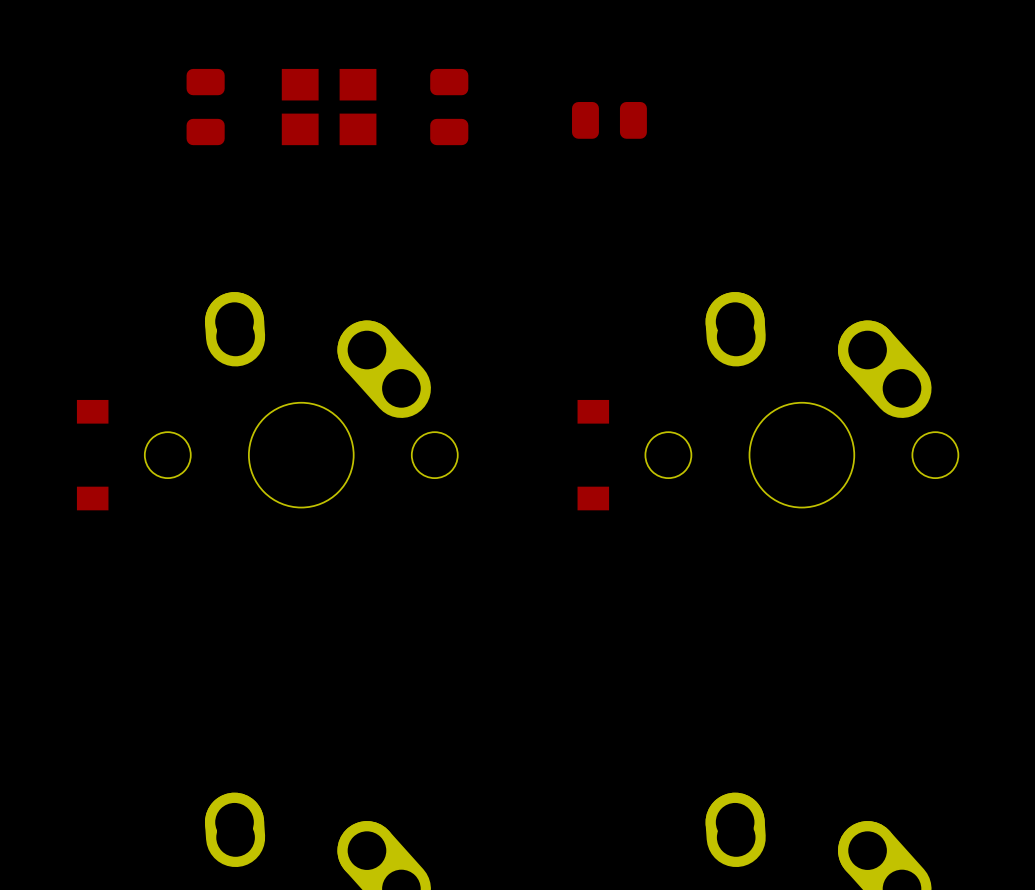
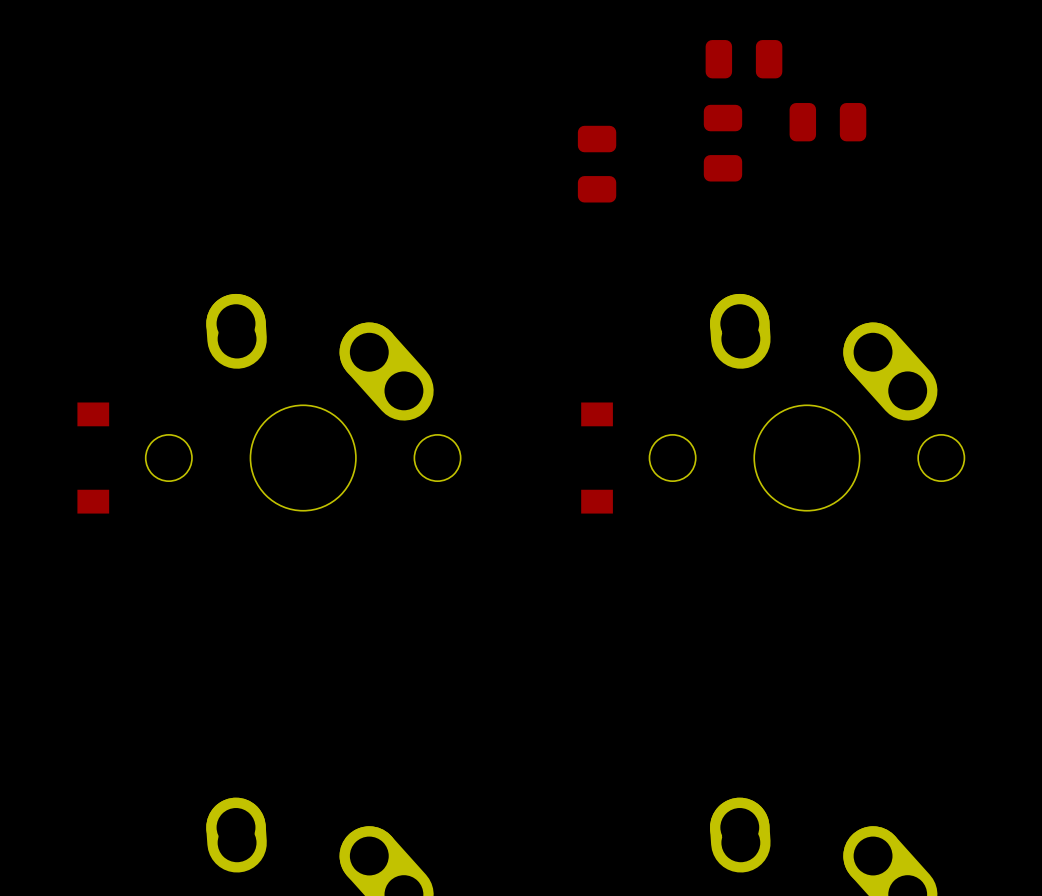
part: none -> (743, 59)
part: (205, 107) -> none
part: (329, 107) -> none
part: (449, 107) -> none
part: (609, 120) -> none
part: none -> (827, 122)
part: none -> (722, 143)
part: none -> (597, 164)

